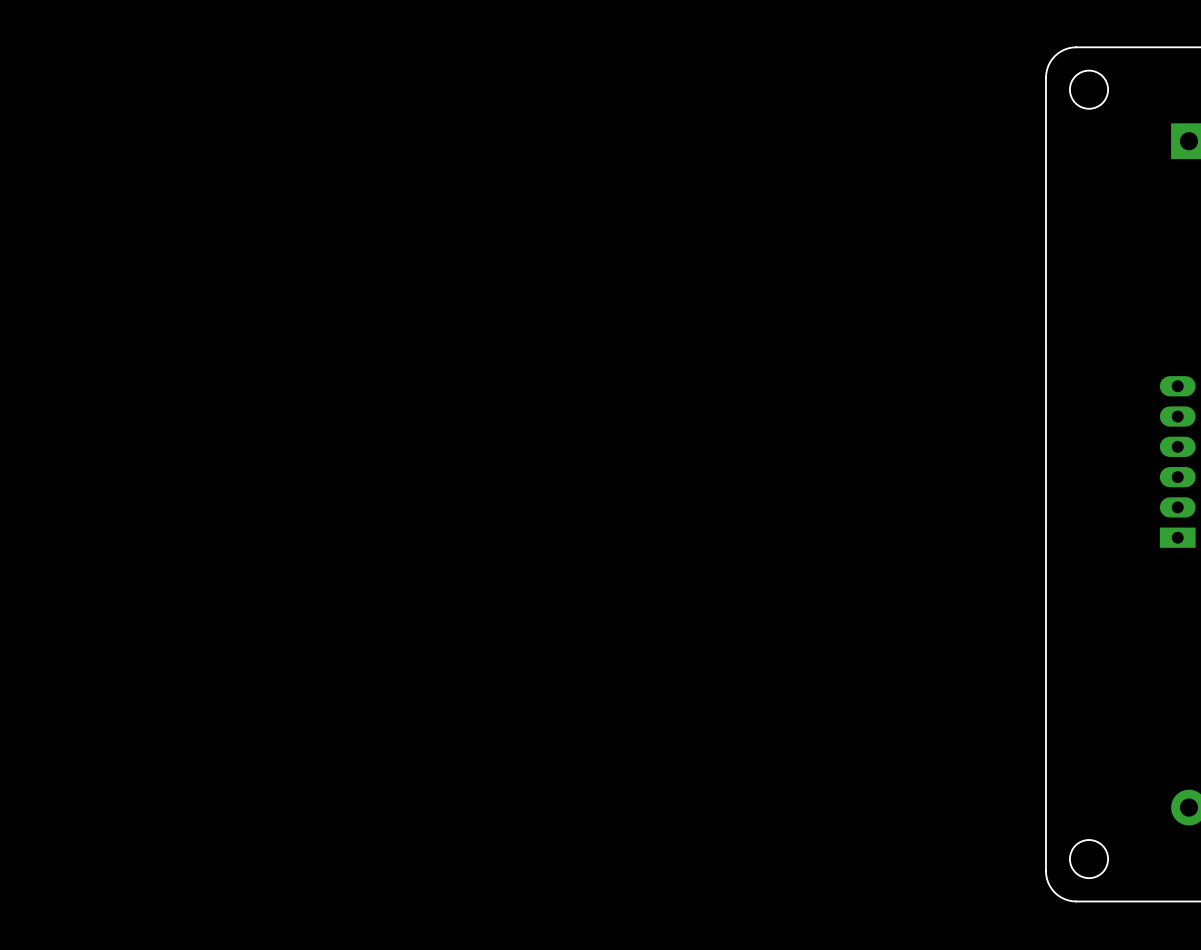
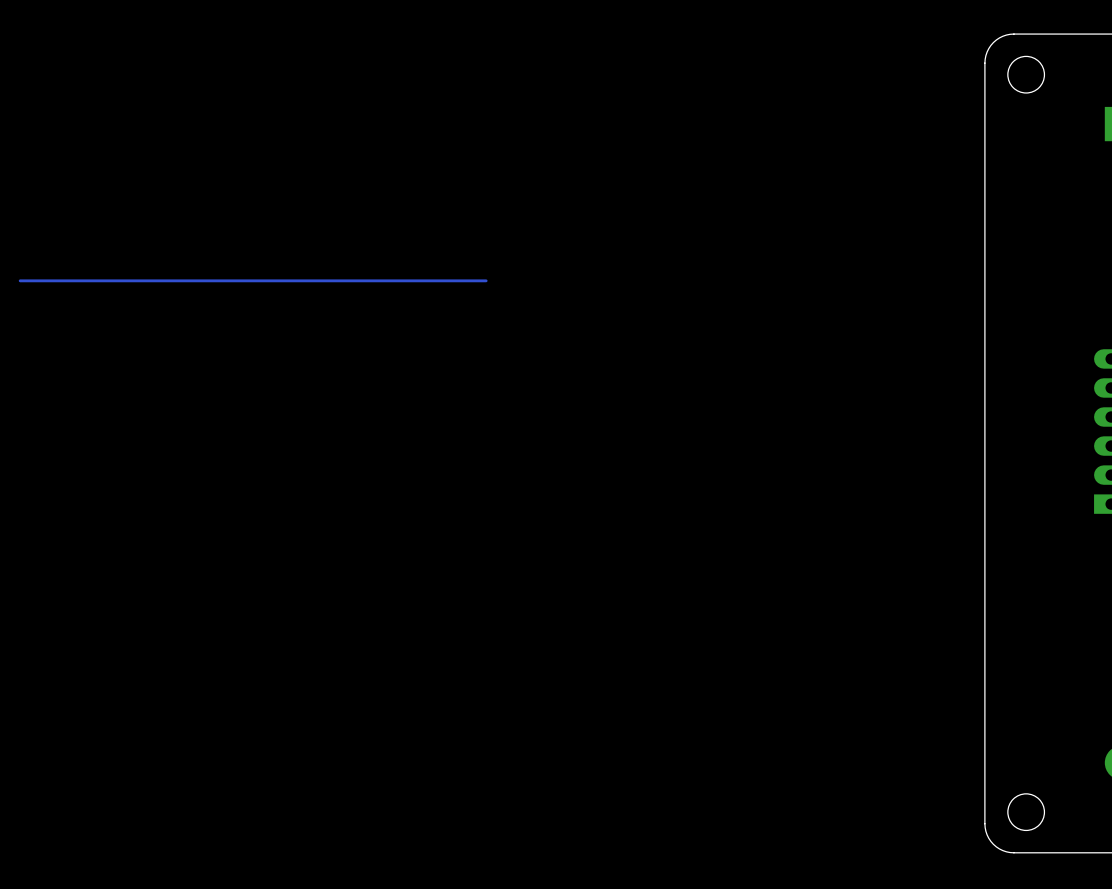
track: none -> (486, 280) (20, 280)

